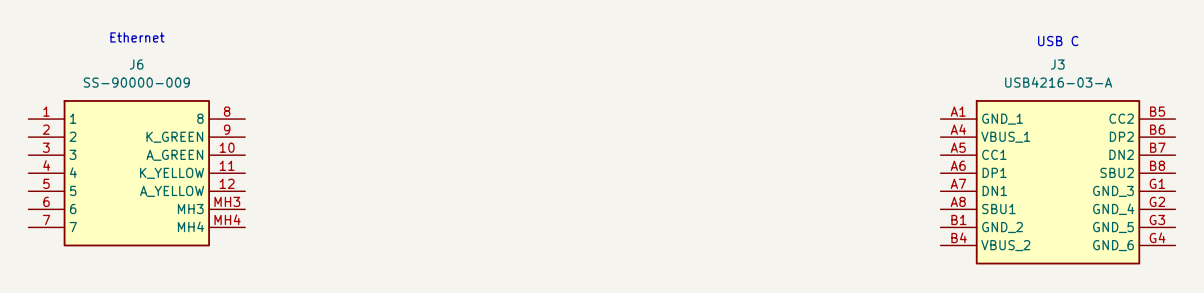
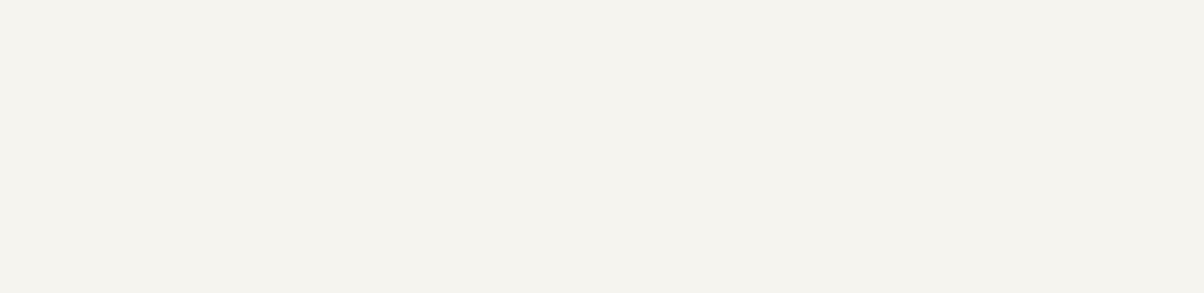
text: Ethernet (137, 37) -> none
text: USB C (1058, 41) -> none
J6: SS-90000-009 (136, 173) -> none
J3: USB4216-03-A (1058, 182) -> none

